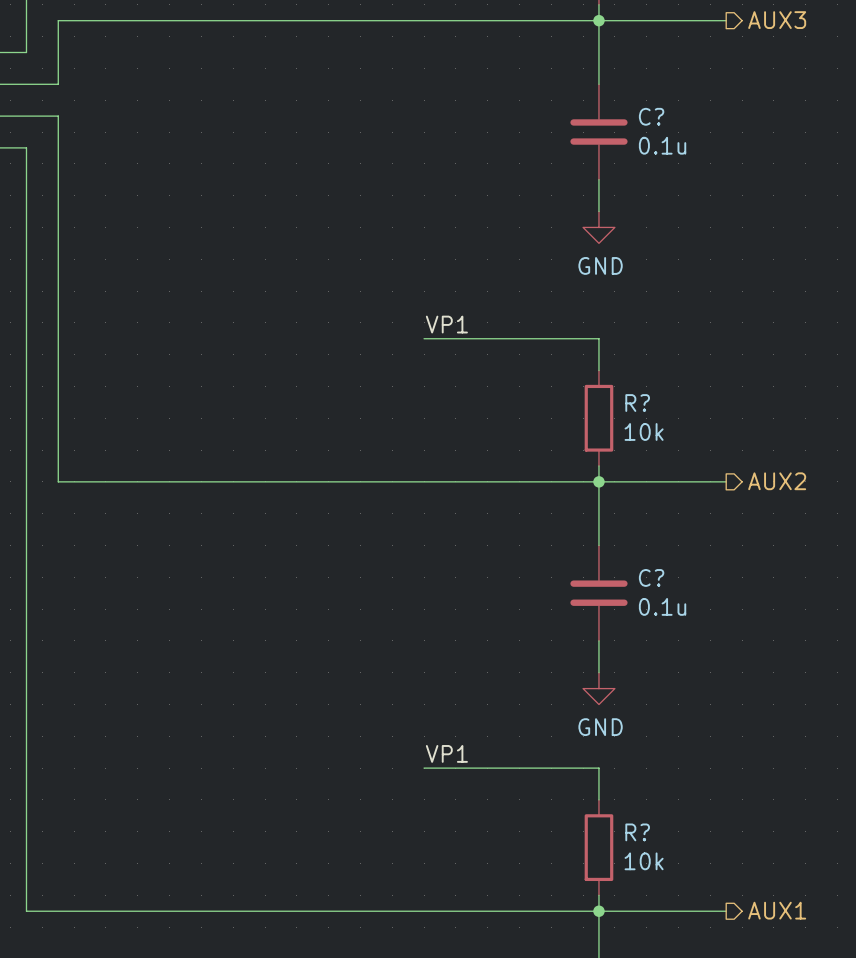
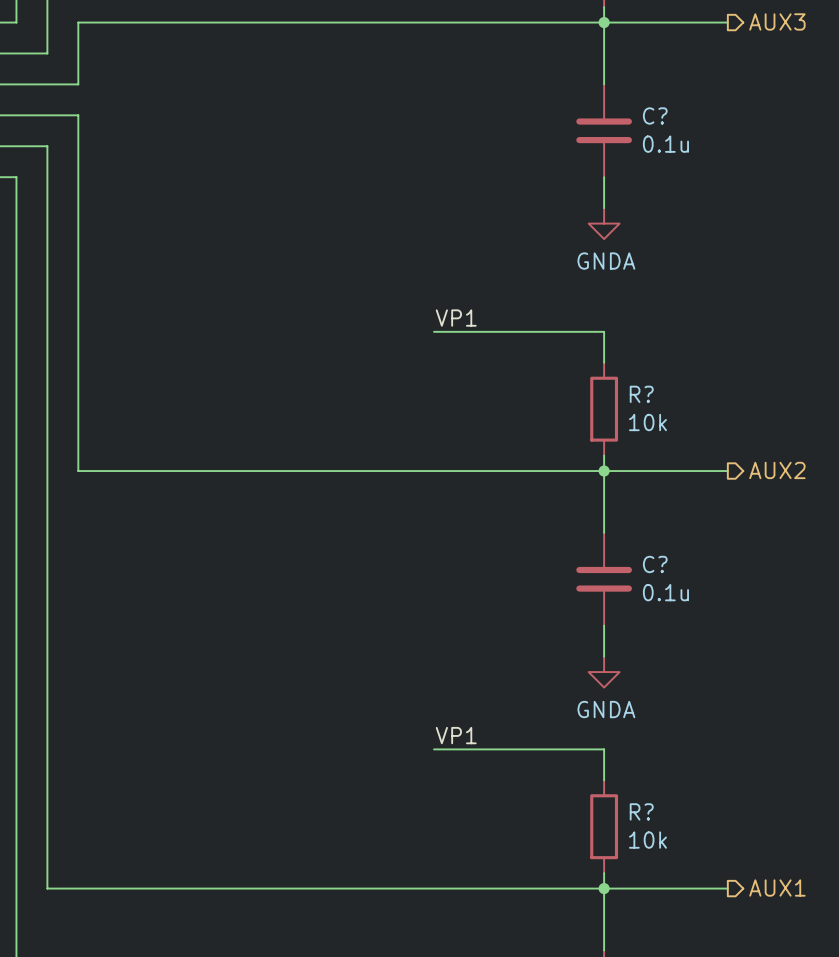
power symbol: GND (598, 227) -> GNDA (604, 223)
power symbol: GND (598, 688) -> GNDA (604, 672)

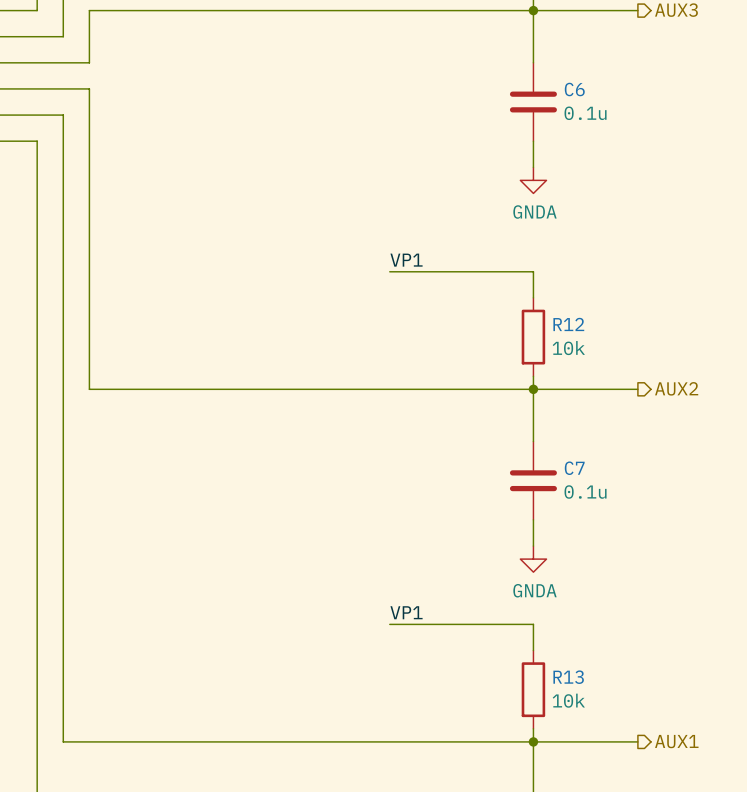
C? name: C? (655, 115) -> C6 (574, 89)
R? name: R? (641, 394) -> R12 (568, 324)
C? name: C? (655, 564) -> C7 (574, 468)
R? name: R? (641, 811) -> R13 (568, 677)

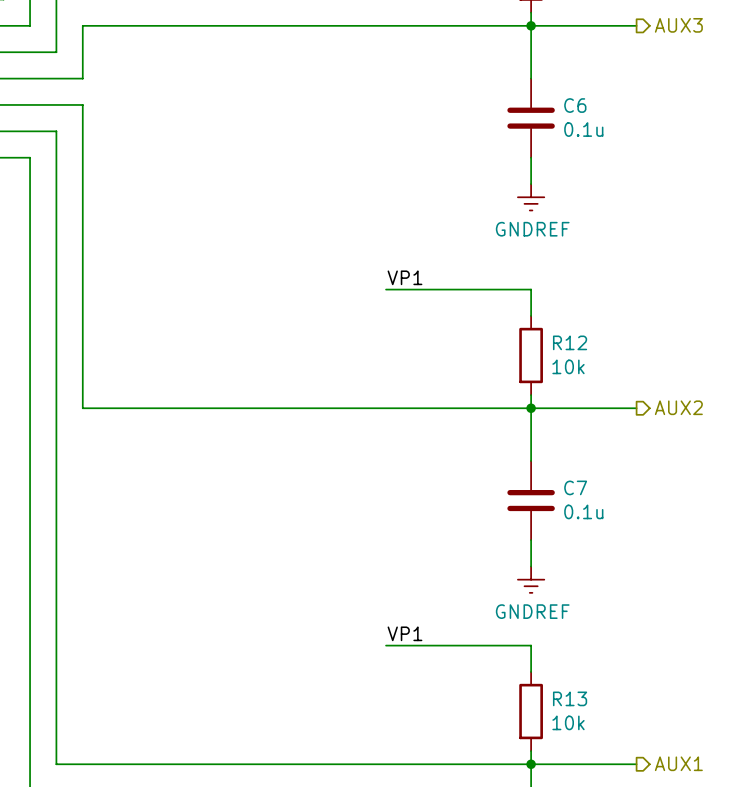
power symbol: GNDA (533, 180) -> GNDREF (531, 197)
power symbol: GNDA (533, 559) -> GNDREF (531, 579)

